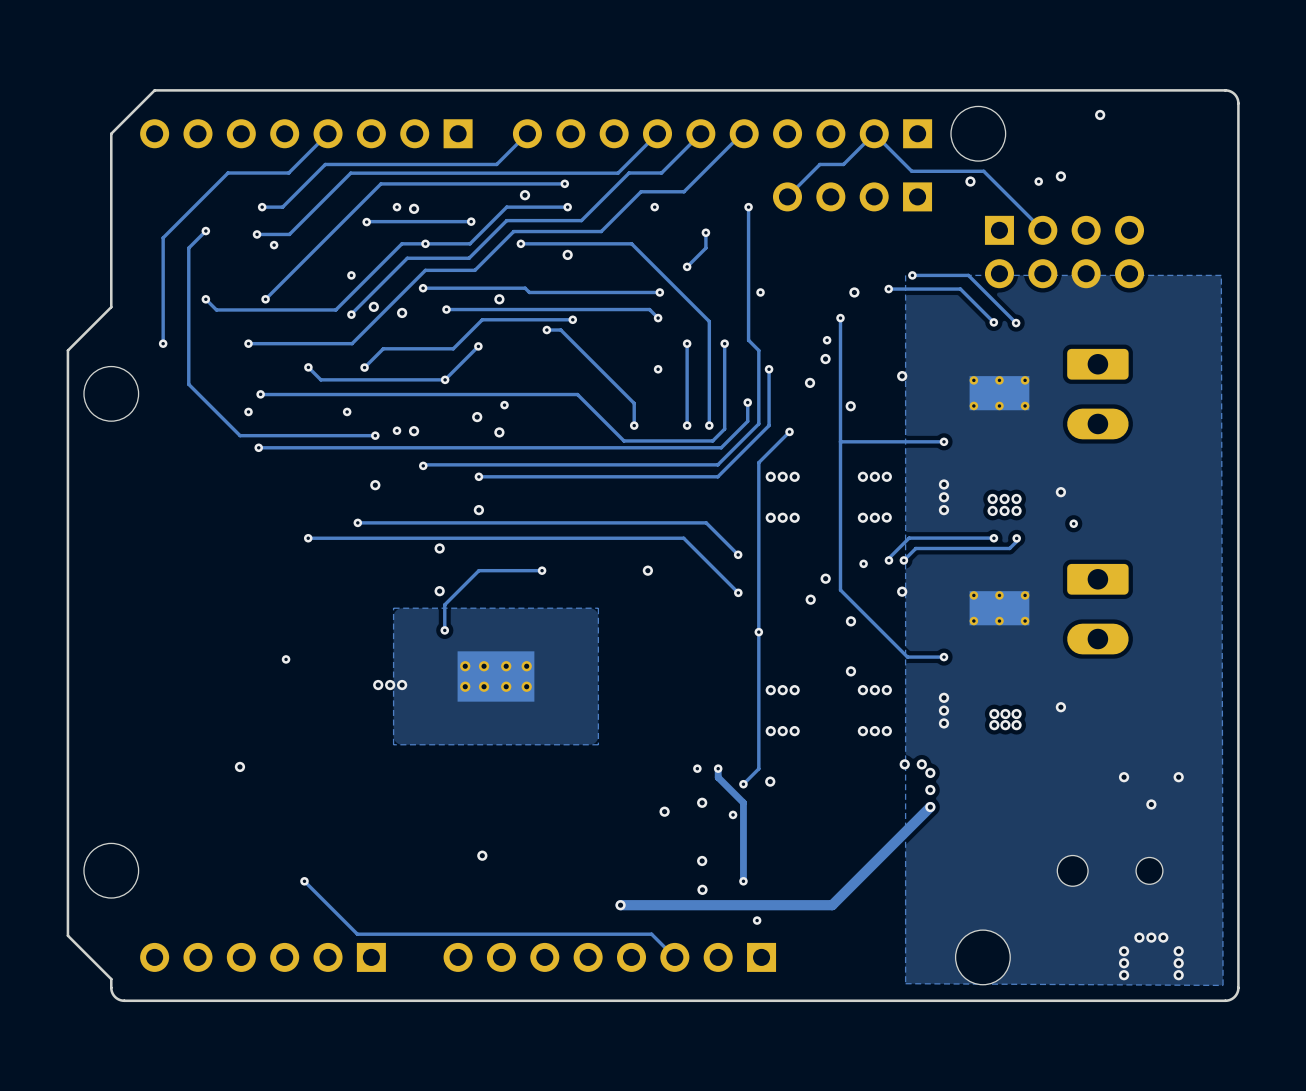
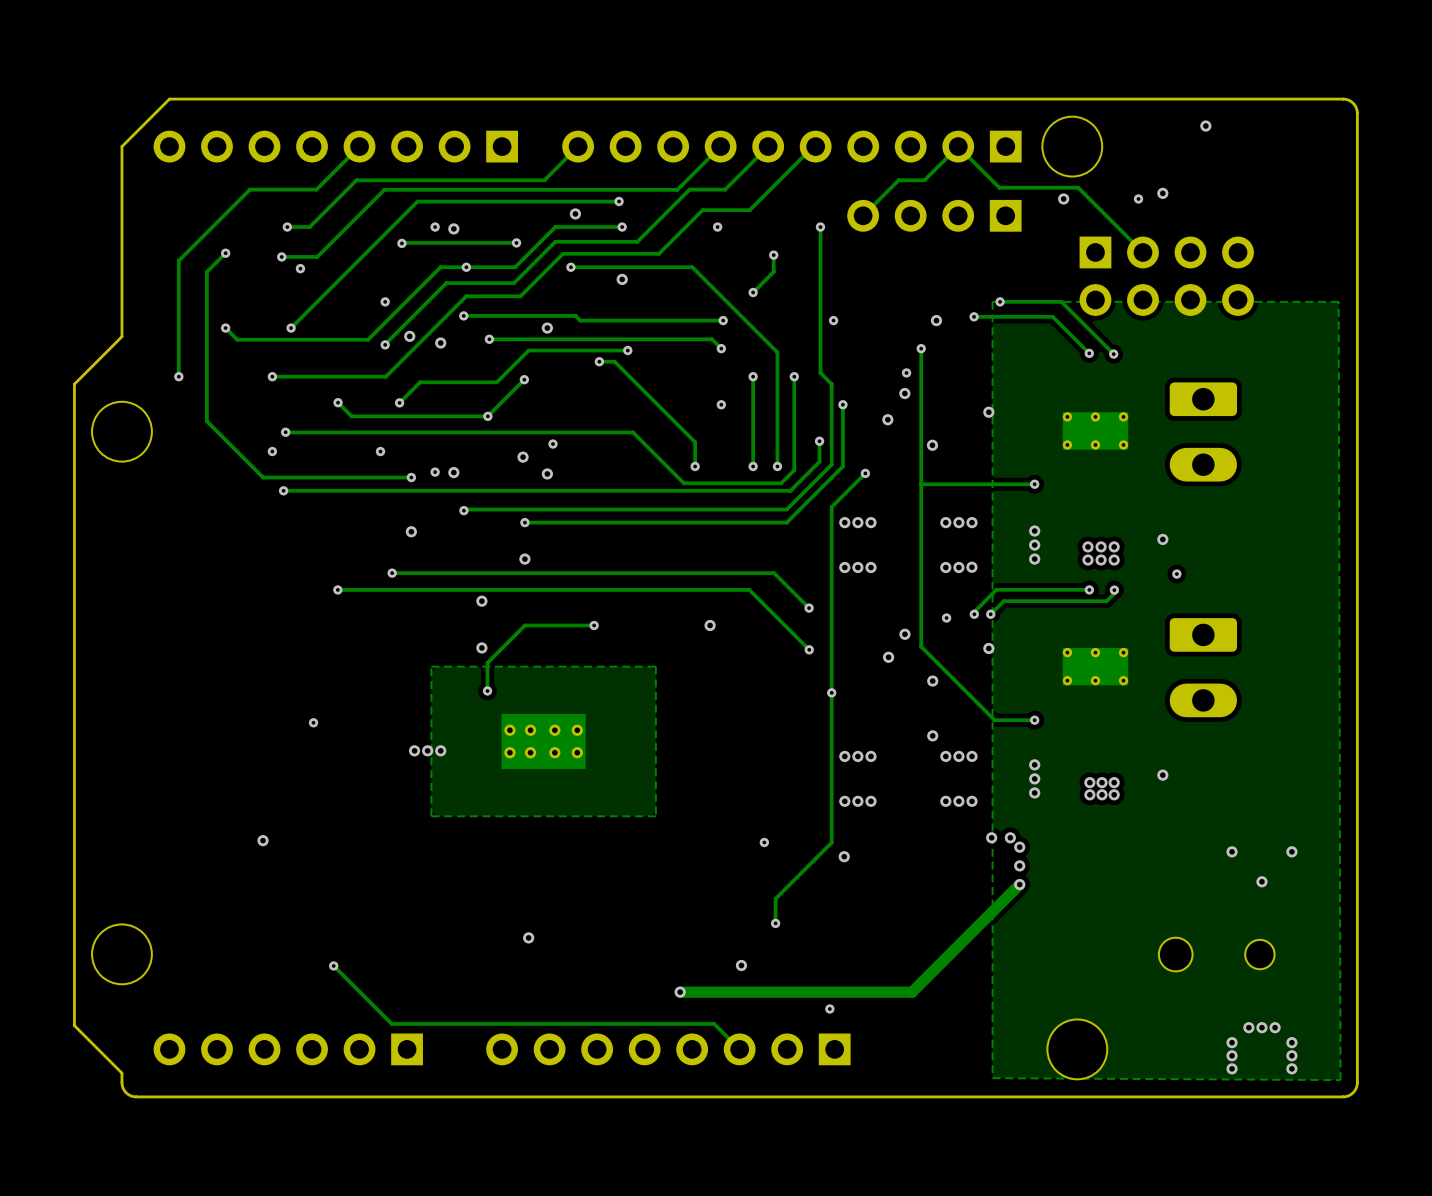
track: (718, 768) (718, 777) (743, 802) (743, 881) -> none
via: (718, 768) -> none
track: none -> (814, 859) (775, 898) (775, 923)
via: (743, 784) -> none
via: (702, 802) -> none
via: (664, 811) -> none
via: (733, 814) -> none
via: none -> (775, 923)
via: (702, 860) -> none
via: none -> (741, 965)
via: (743, 881) -> none
via: (702, 889) -> none

